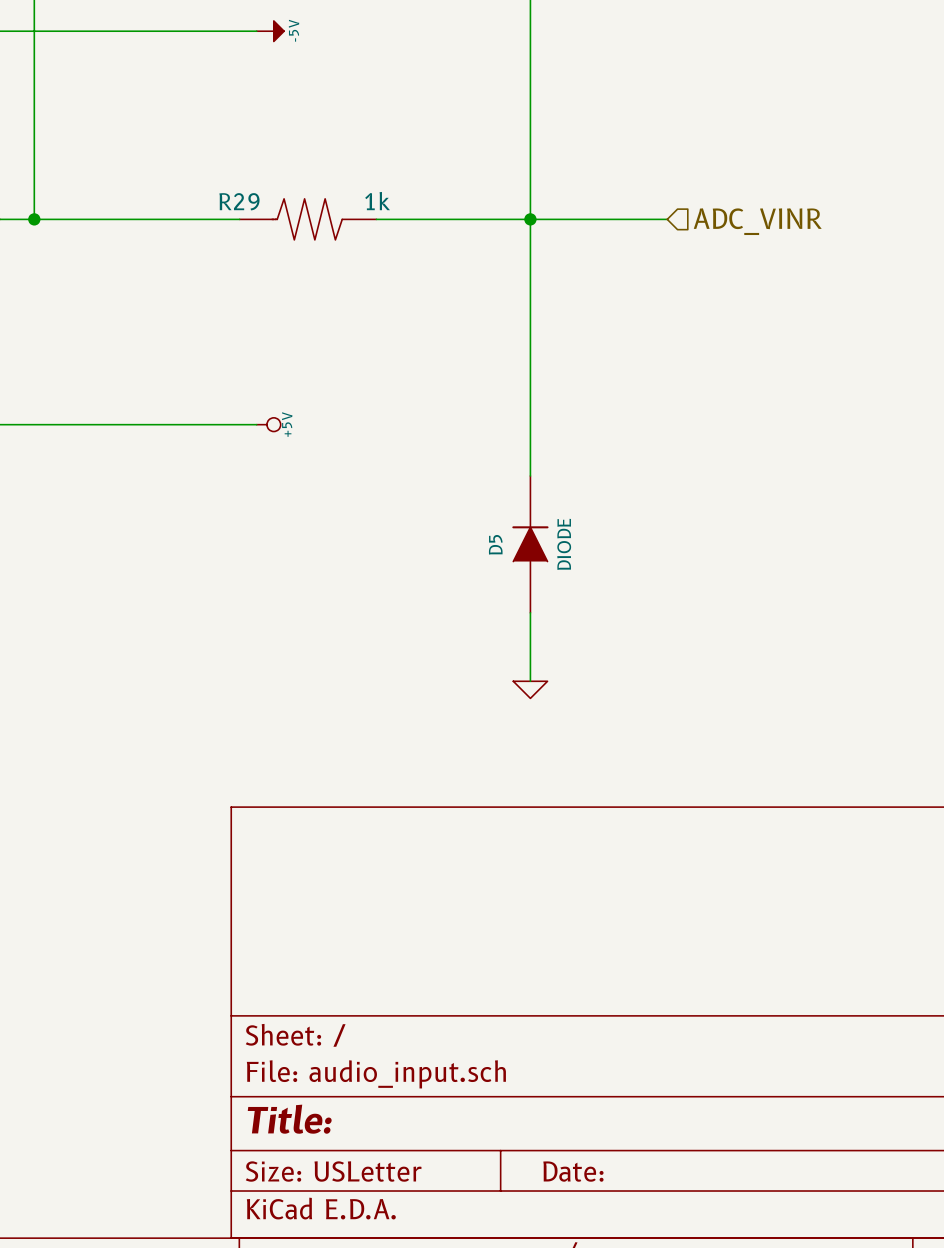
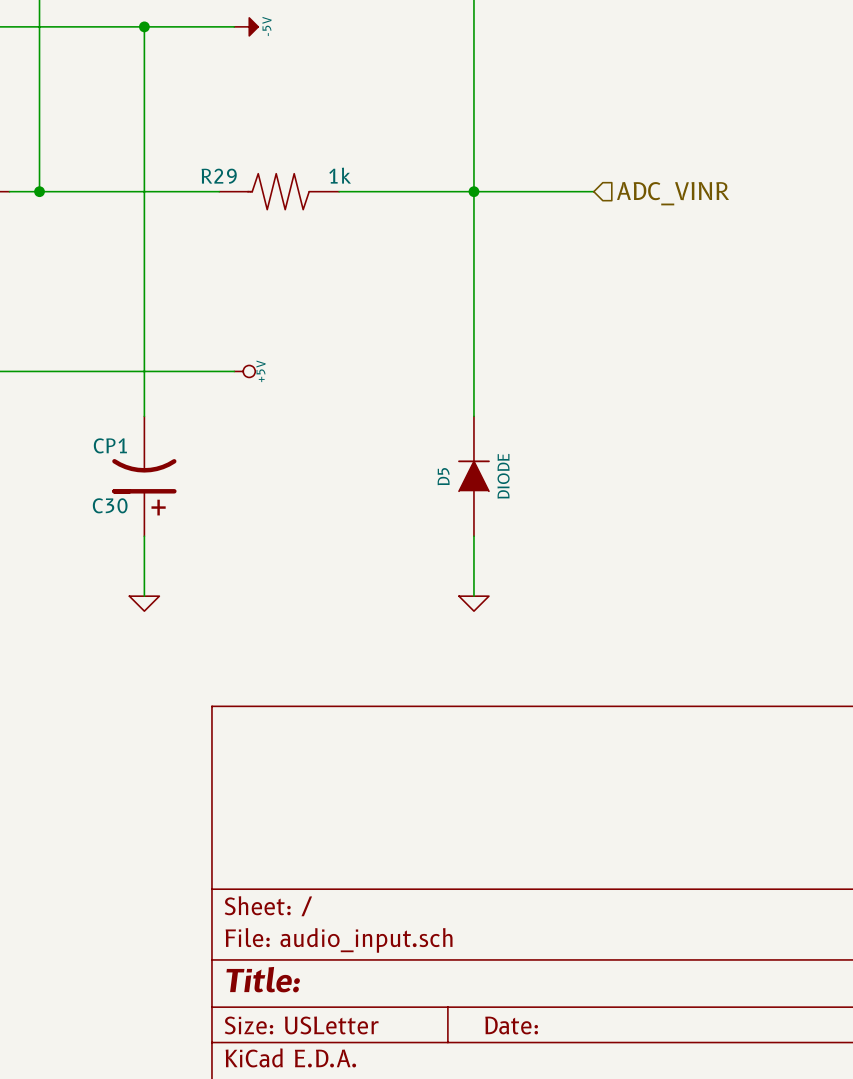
wire: none -> (144, 26) (144, 416)
junction: none -> (144, 26)
C30: none -> CP1 (144, 476)
wire: none -> (144, 536) (144, 596)
power symbol: none -> (144, 603)

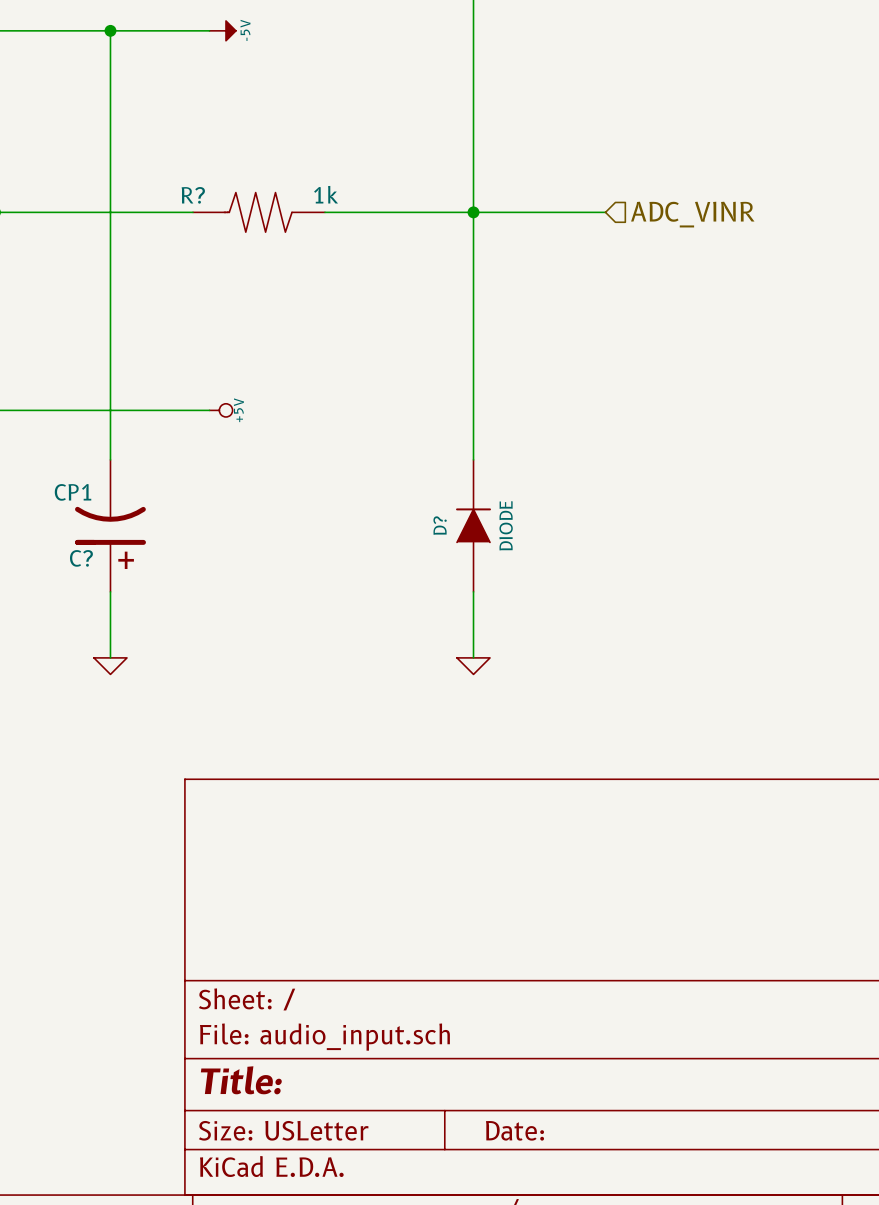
R29 name: R29 (219, 176) -> R? (193, 195)
D5 name: D5 (443, 476) -> D? (440, 525)
C30 name: C30 (110, 505) -> C? (81, 558)

